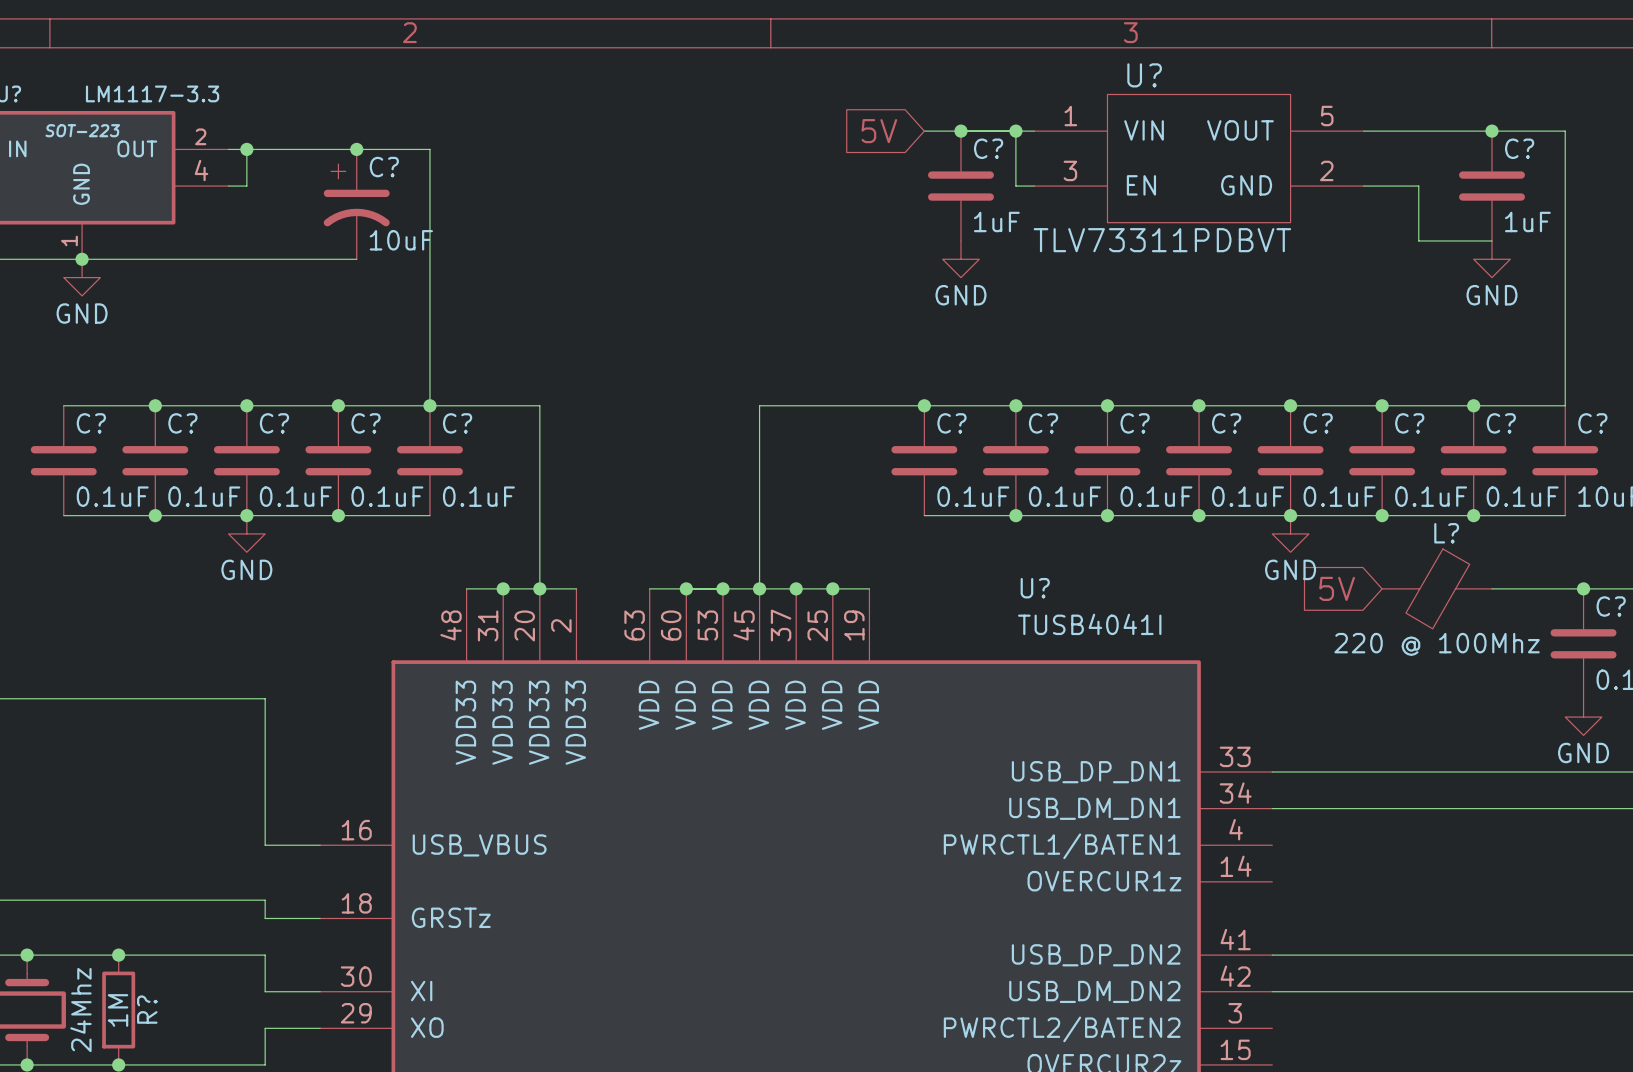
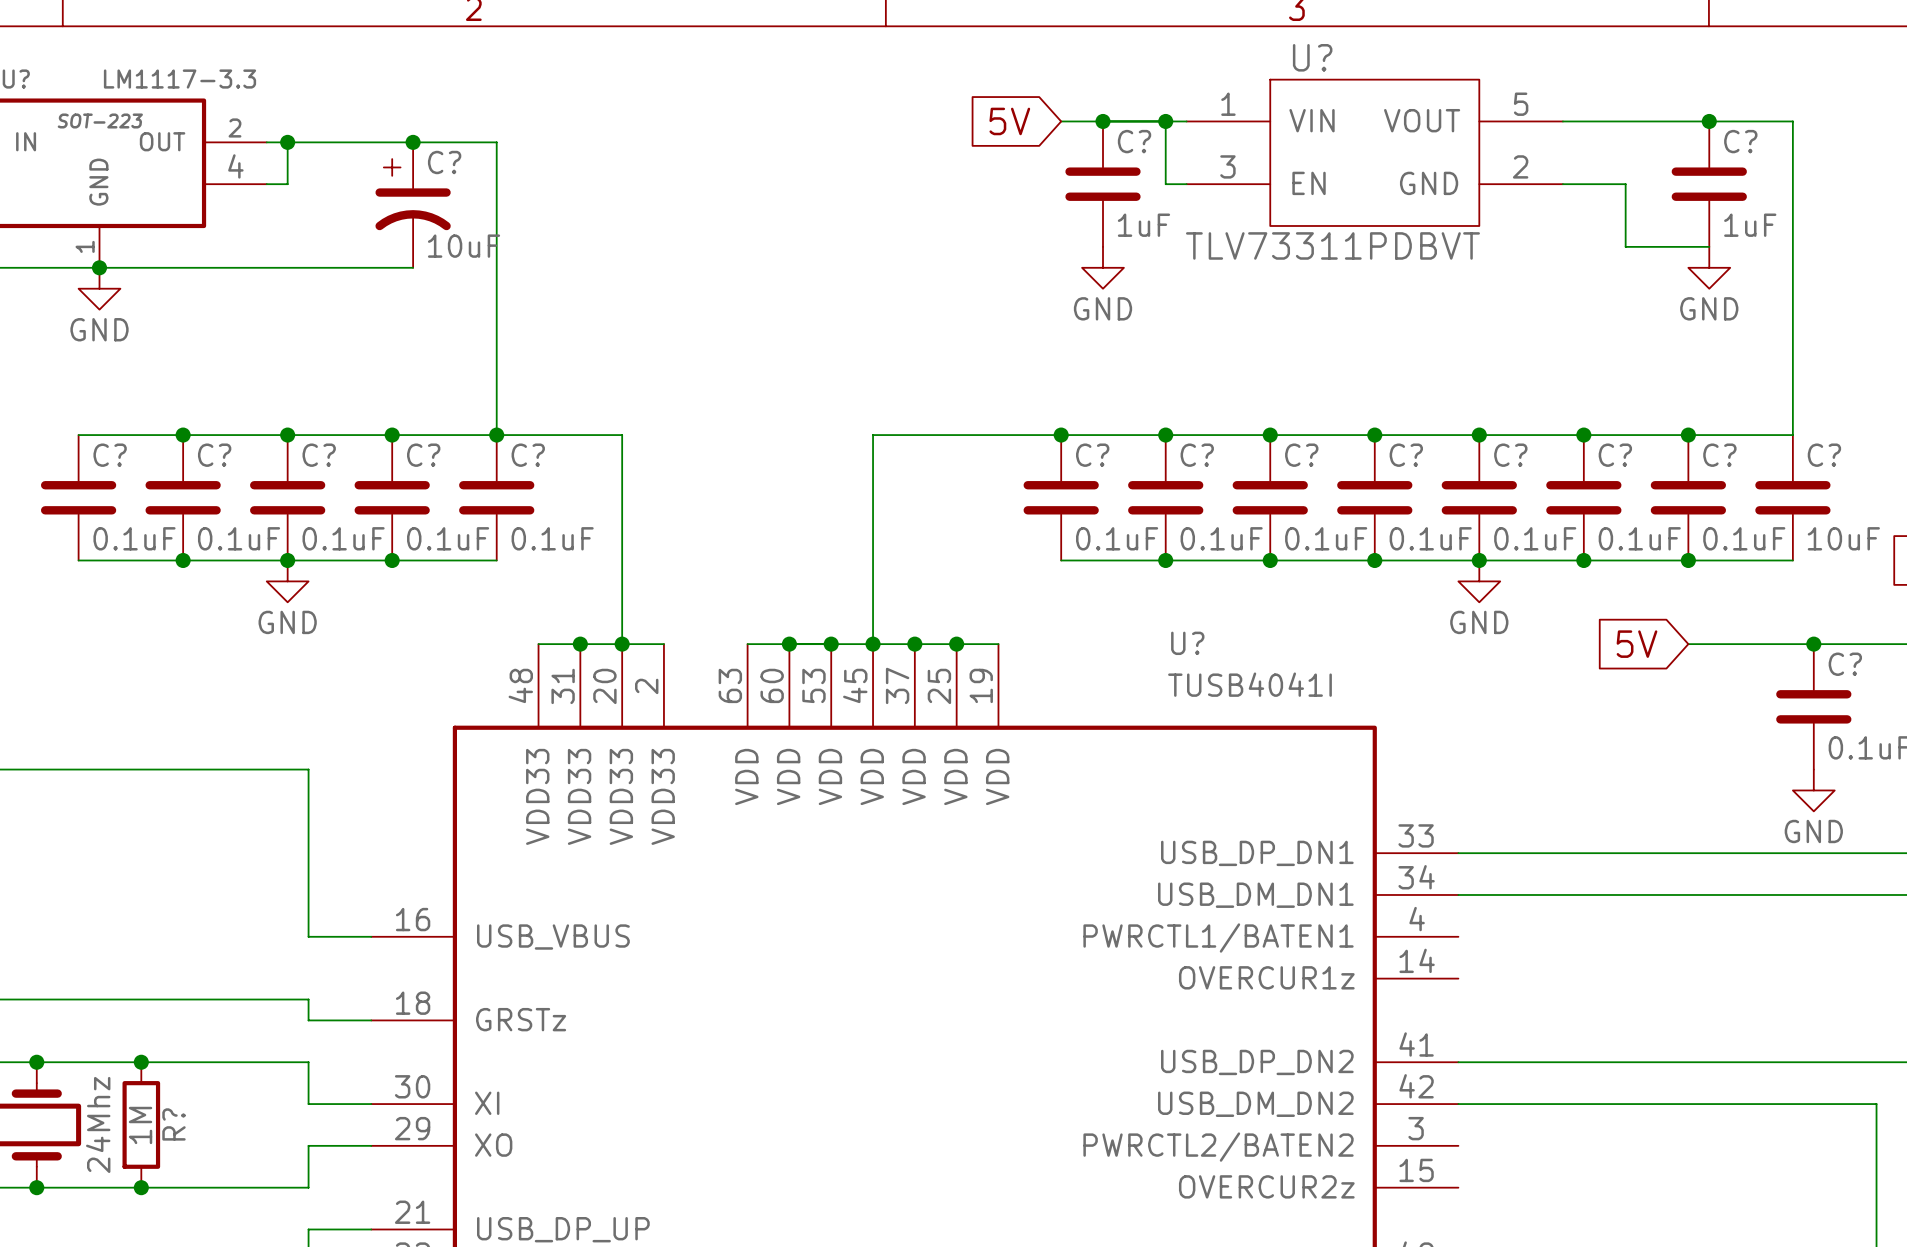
global label position: 5V (1337, 588) -> 5V (1636, 644)
L?: 220 @ 100Mhz (1437, 588) -> none

